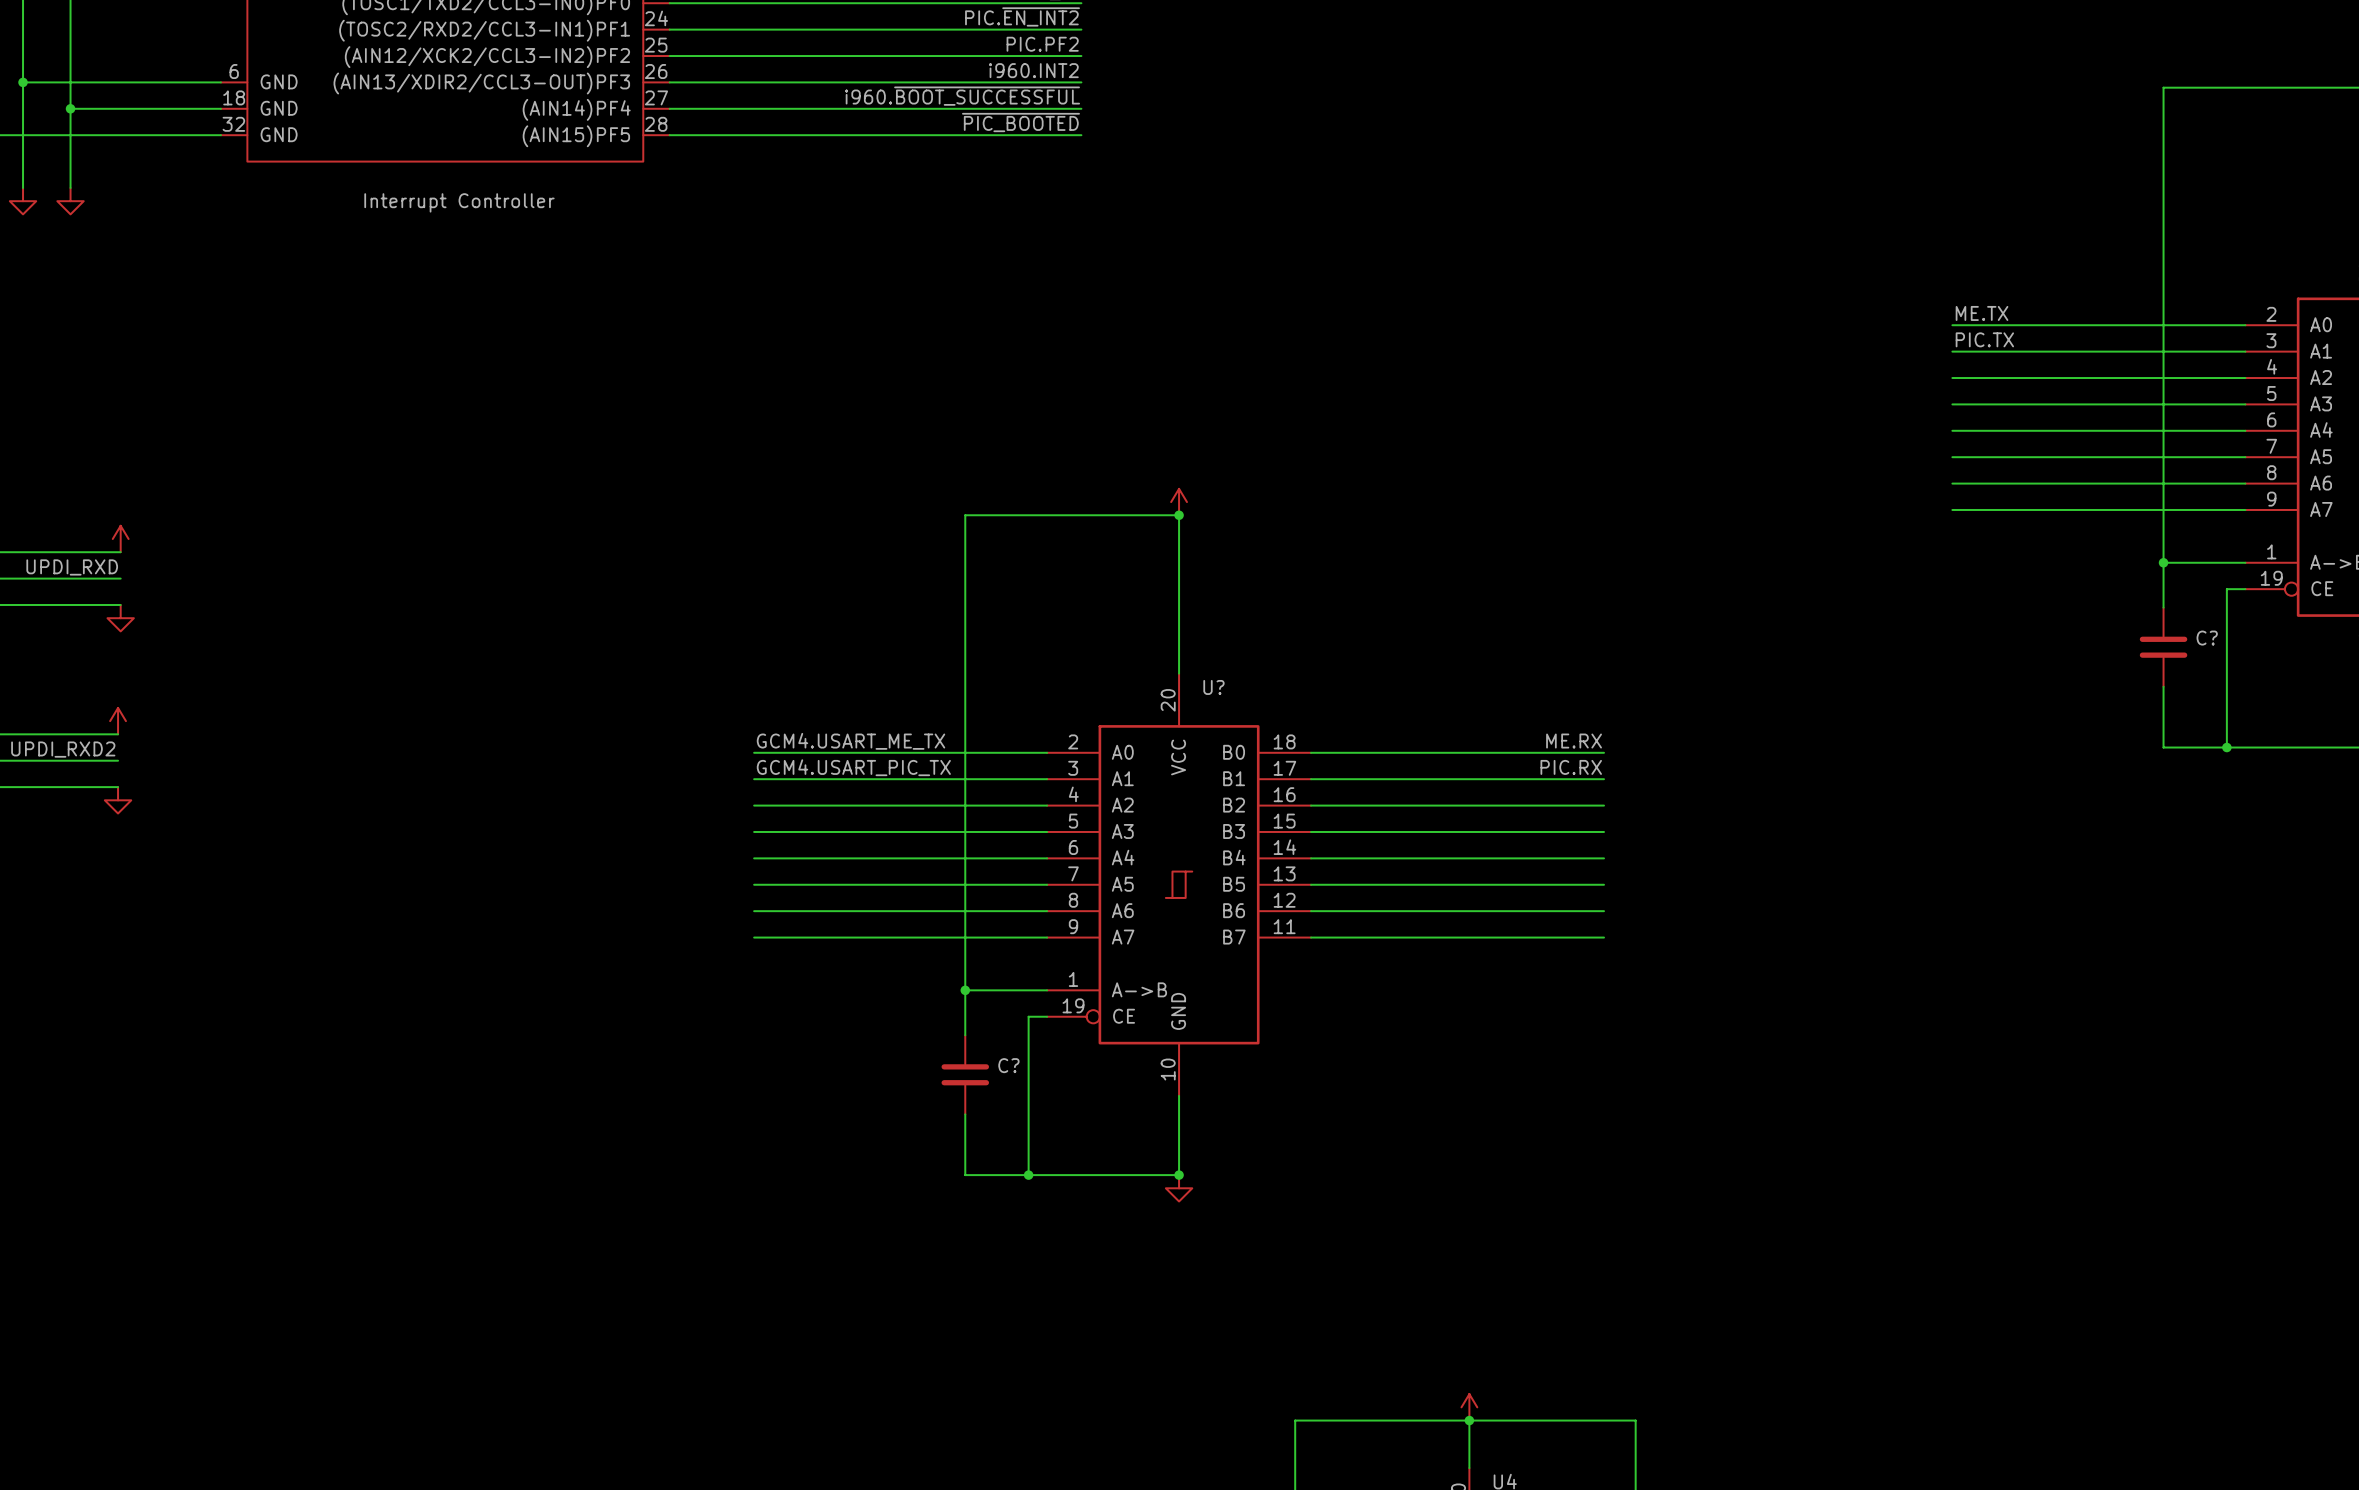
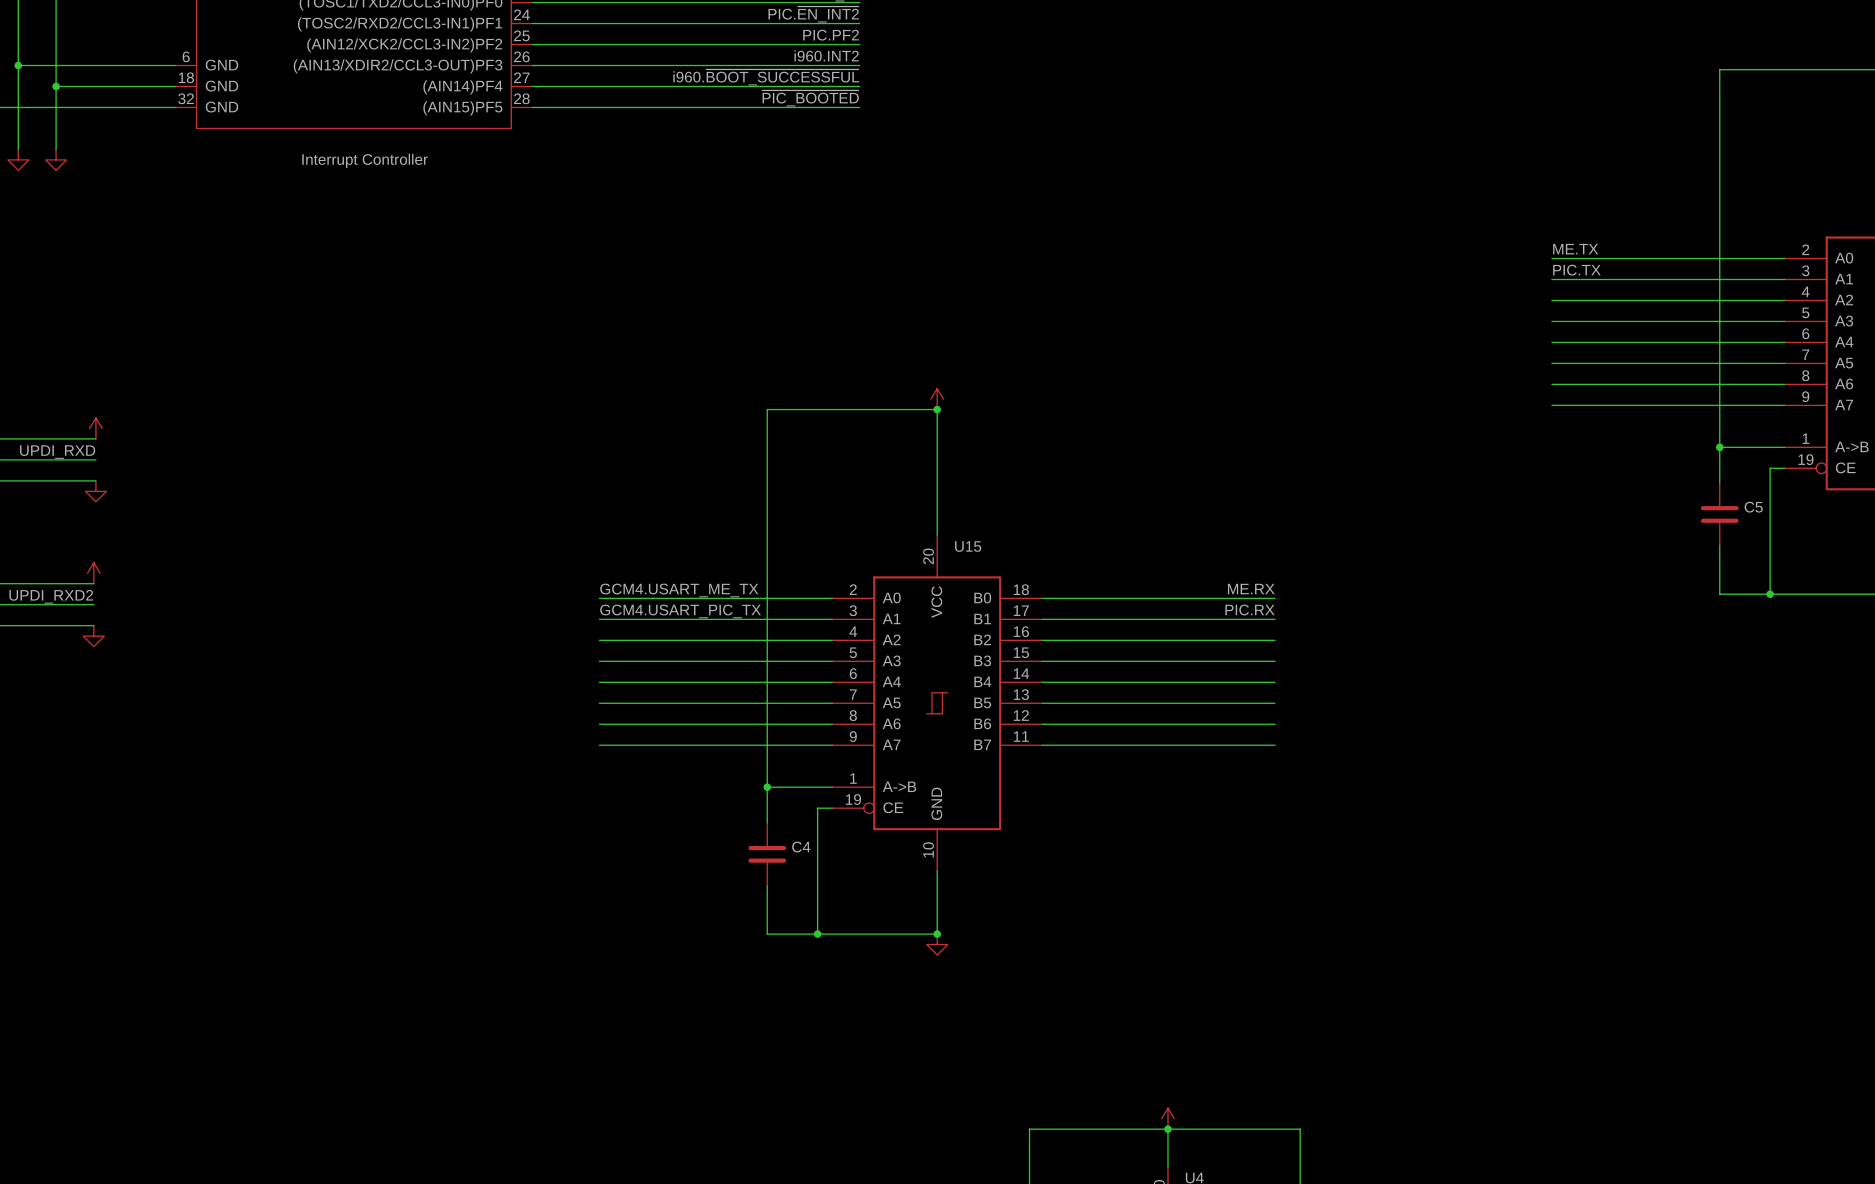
C? name: C? (2207, 638) -> C5 (1753, 507)
U? name: U? (1213, 687) -> U15 (968, 546)
C? name: C? (1008, 1065) -> C4 (801, 847)

